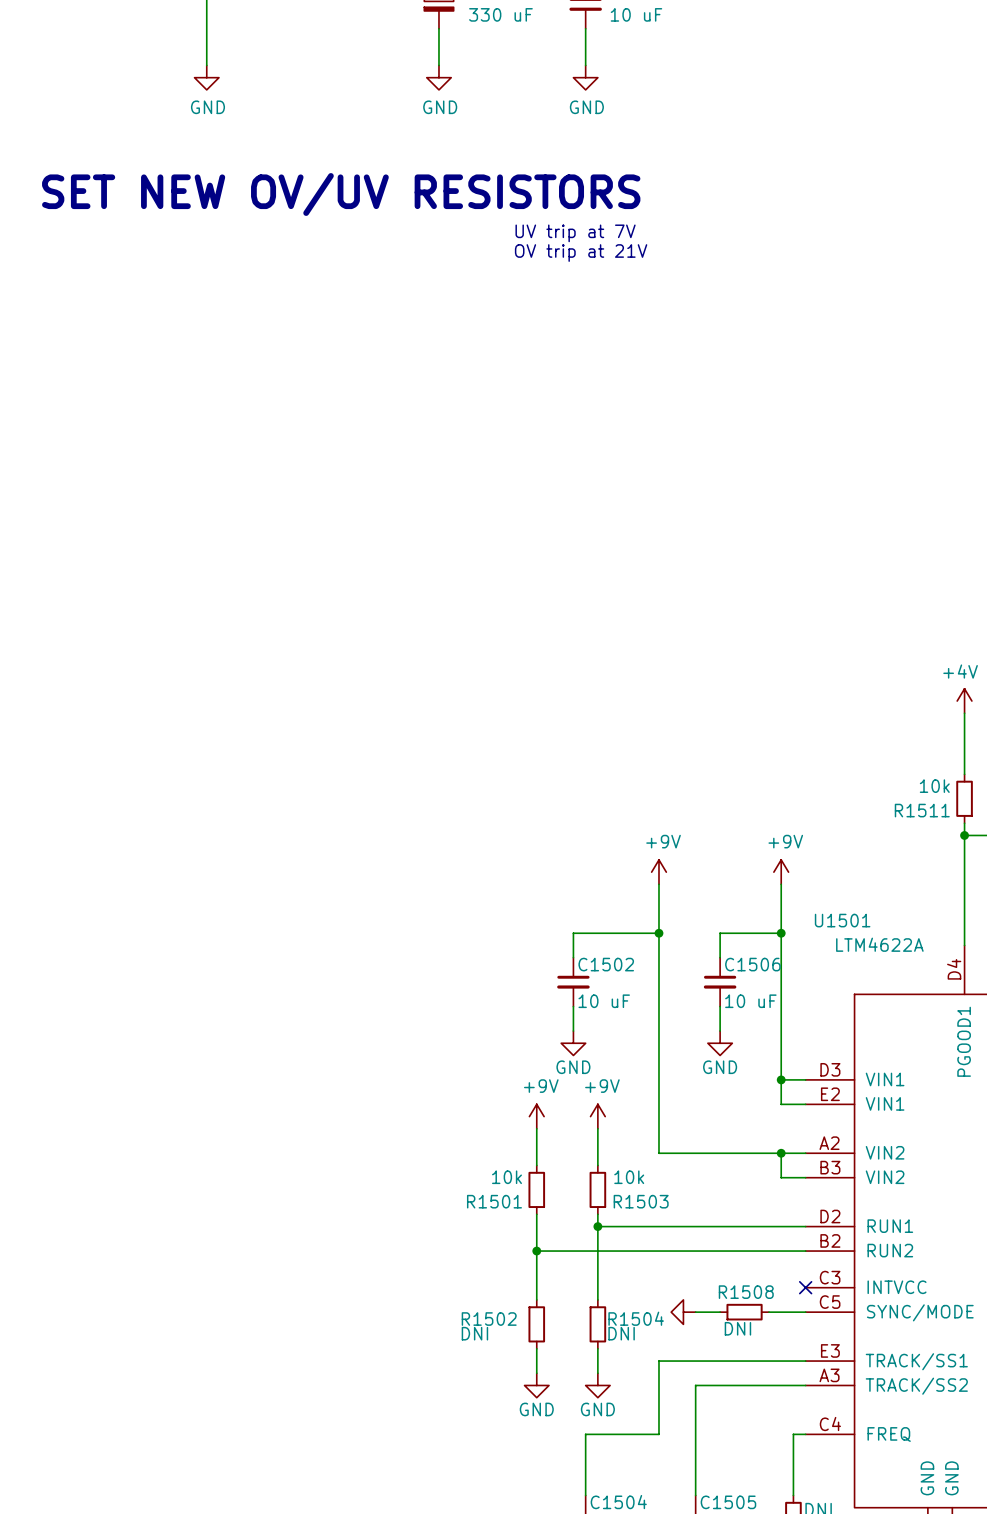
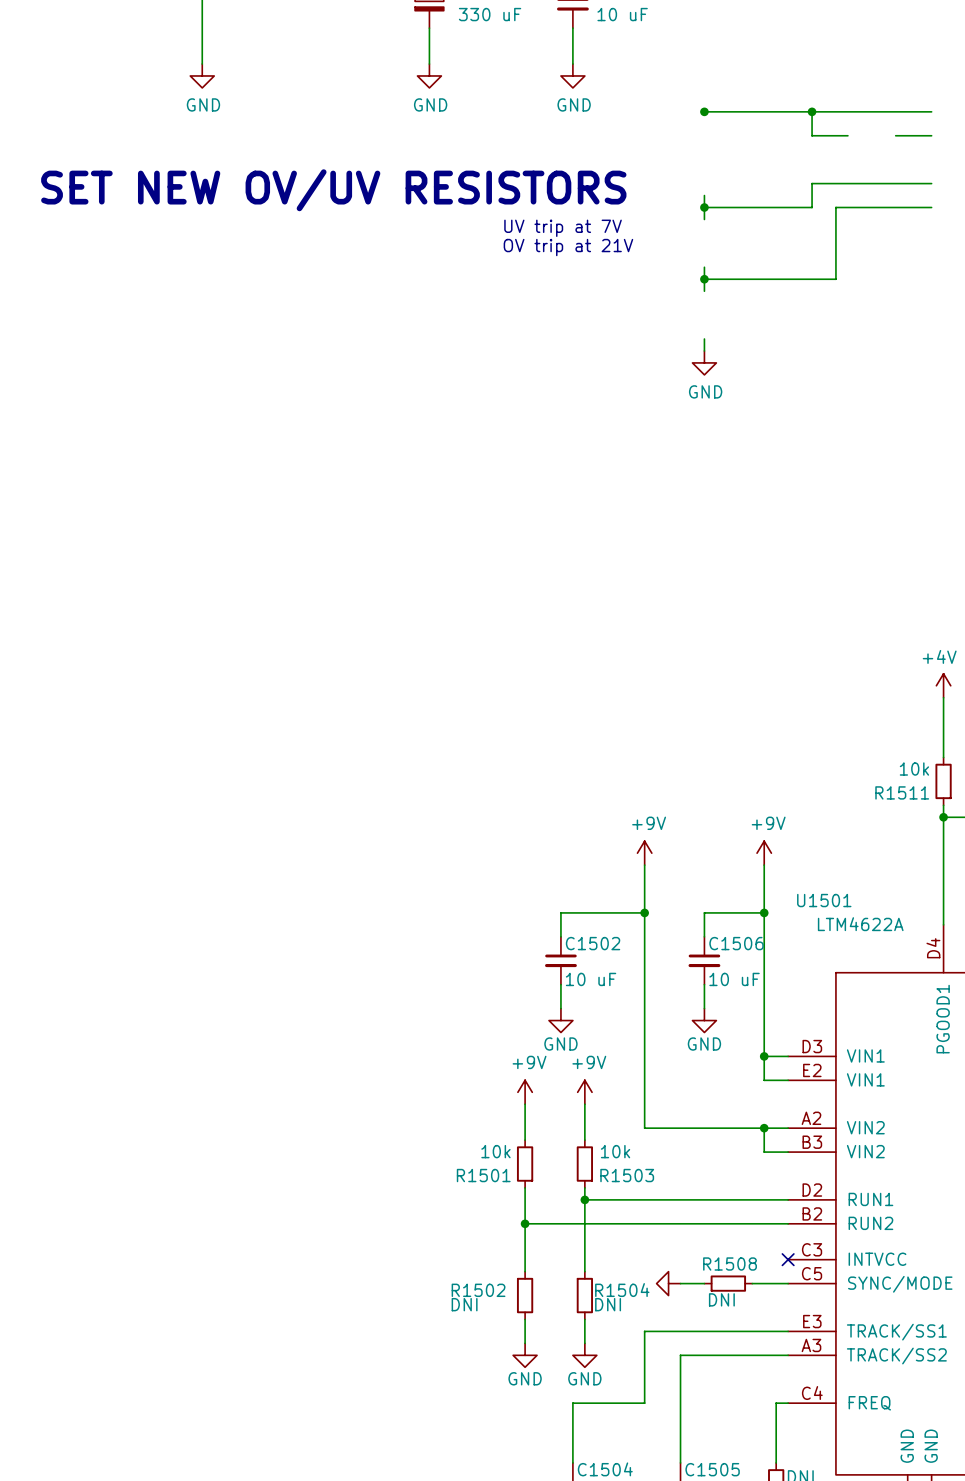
wire: none -> (704, 111) (931, 111)
junction: none -> (704, 111)
wire: none -> (812, 111) (812, 135) (847, 135)
junction: none -> (812, 111)
wire: none -> (895, 135) (931, 135)
wire: none -> (931, 183) (812, 183) (812, 207) (704, 207)
wire: none -> (704, 195) (704, 219)
junction: none -> (704, 207)
wire: none -> (931, 207) (835, 207) (835, 279) (704, 279)
wire: none -> (704, 267) (704, 291)
junction: none -> (704, 279)
wire: none -> (704, 339) (704, 350)
power symbol: none -> GND (704, 362)

